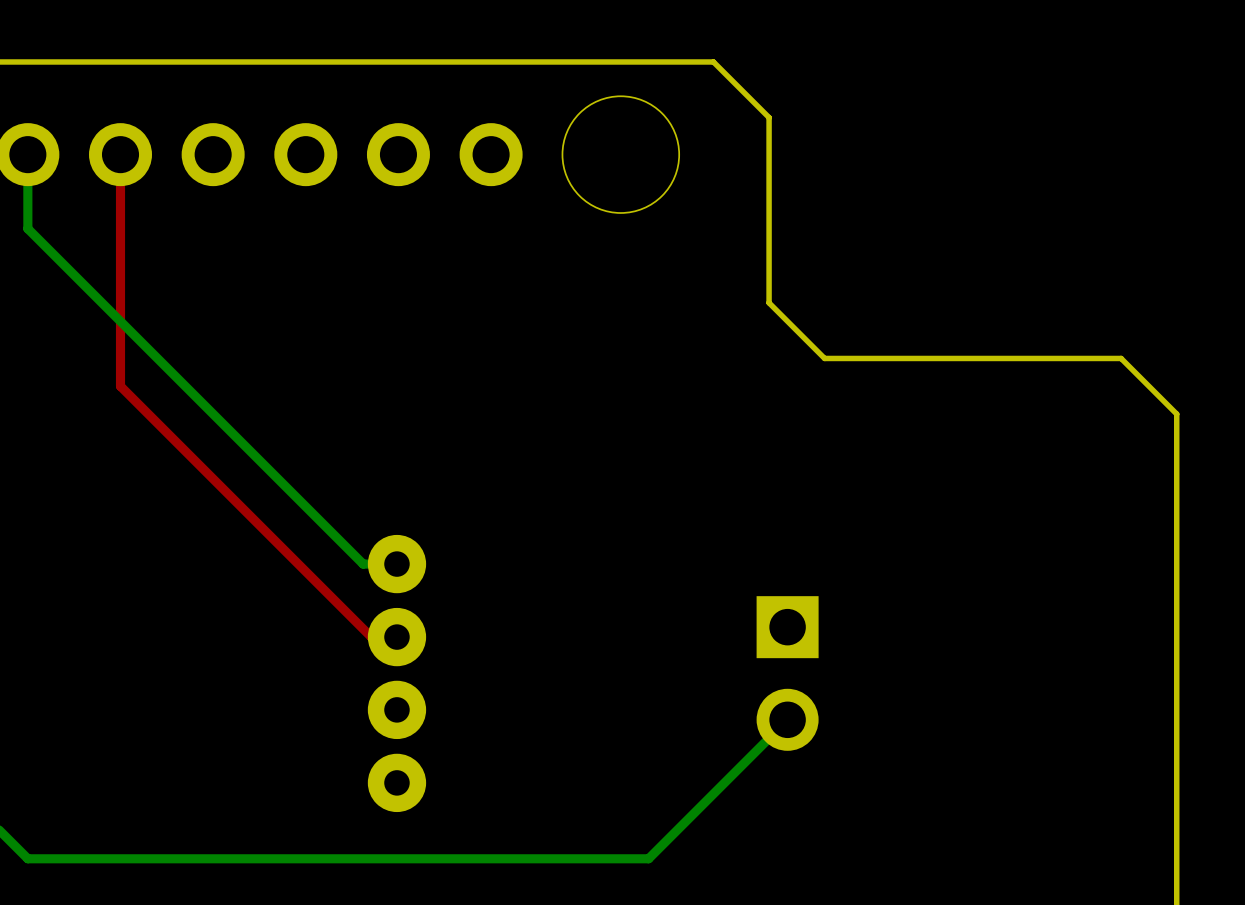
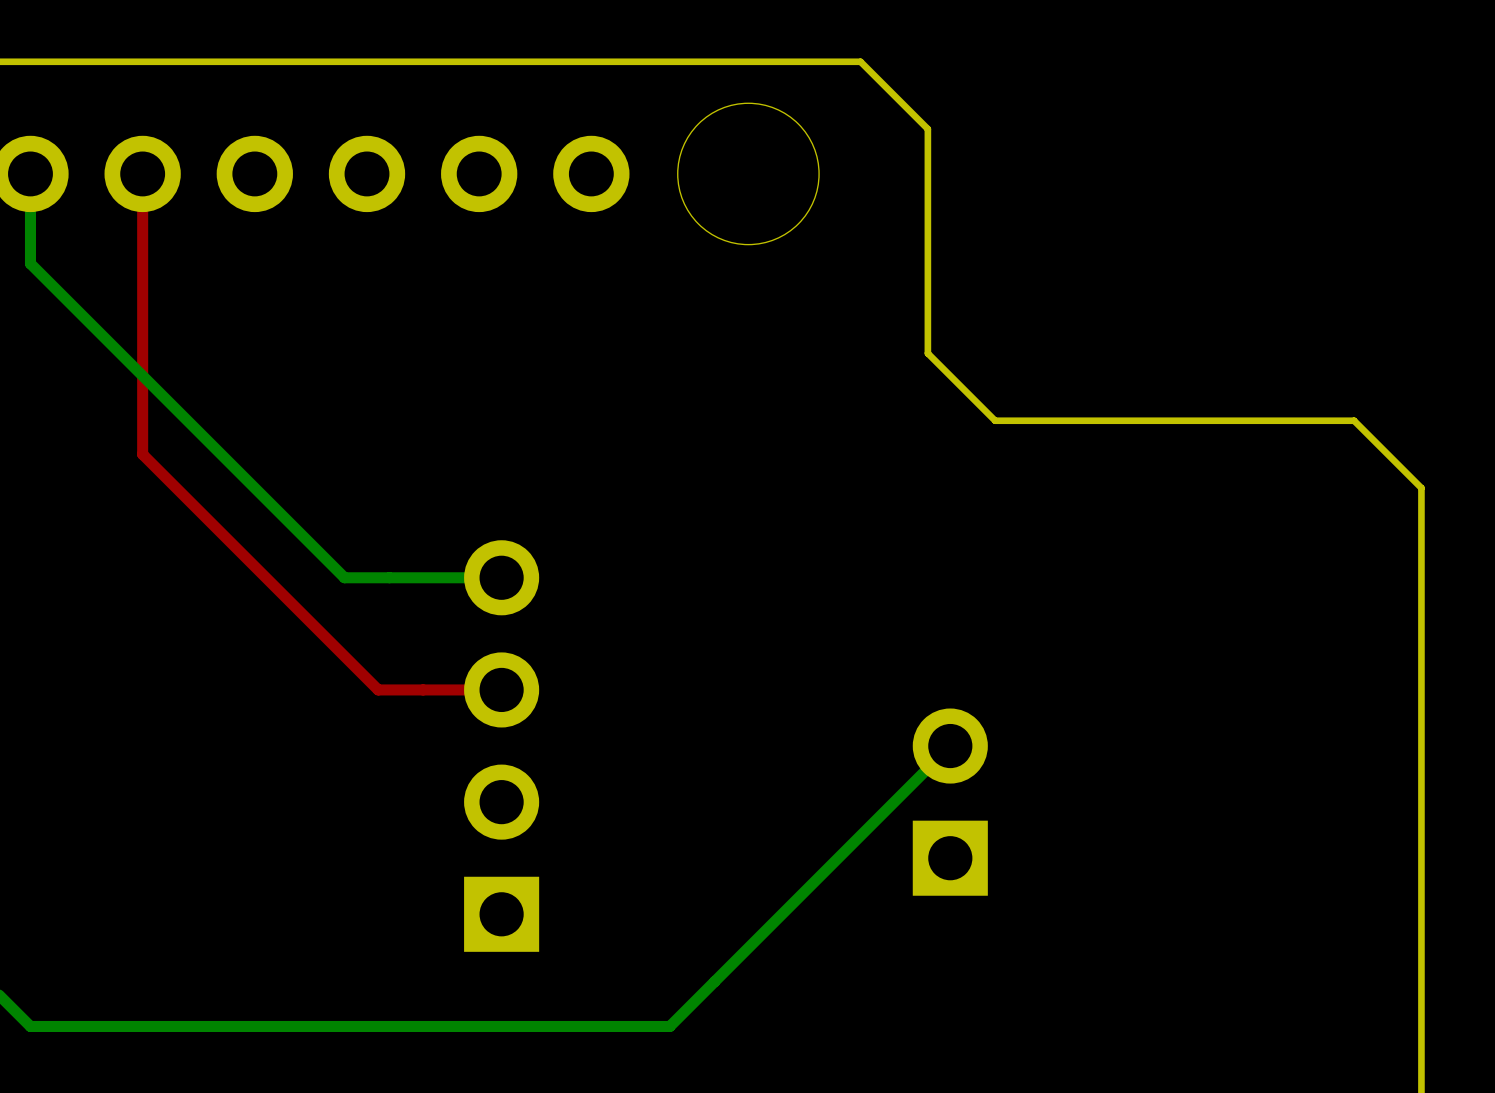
bottom track: (287, 488) (363, 564) (396, 564) -> (344, 577) (501, 577)
top track: (315, 580) (371, 637) (396, 637) -> (378, 689) (501, 689)
part: none -> (501, 746)
part: (396, 673) -> none
part rotation: 0° (787, 673) -> 180° (950, 802)
bottom track: (787, 719) (648, 858) (555, 858) -> (950, 746) (669, 1026)

